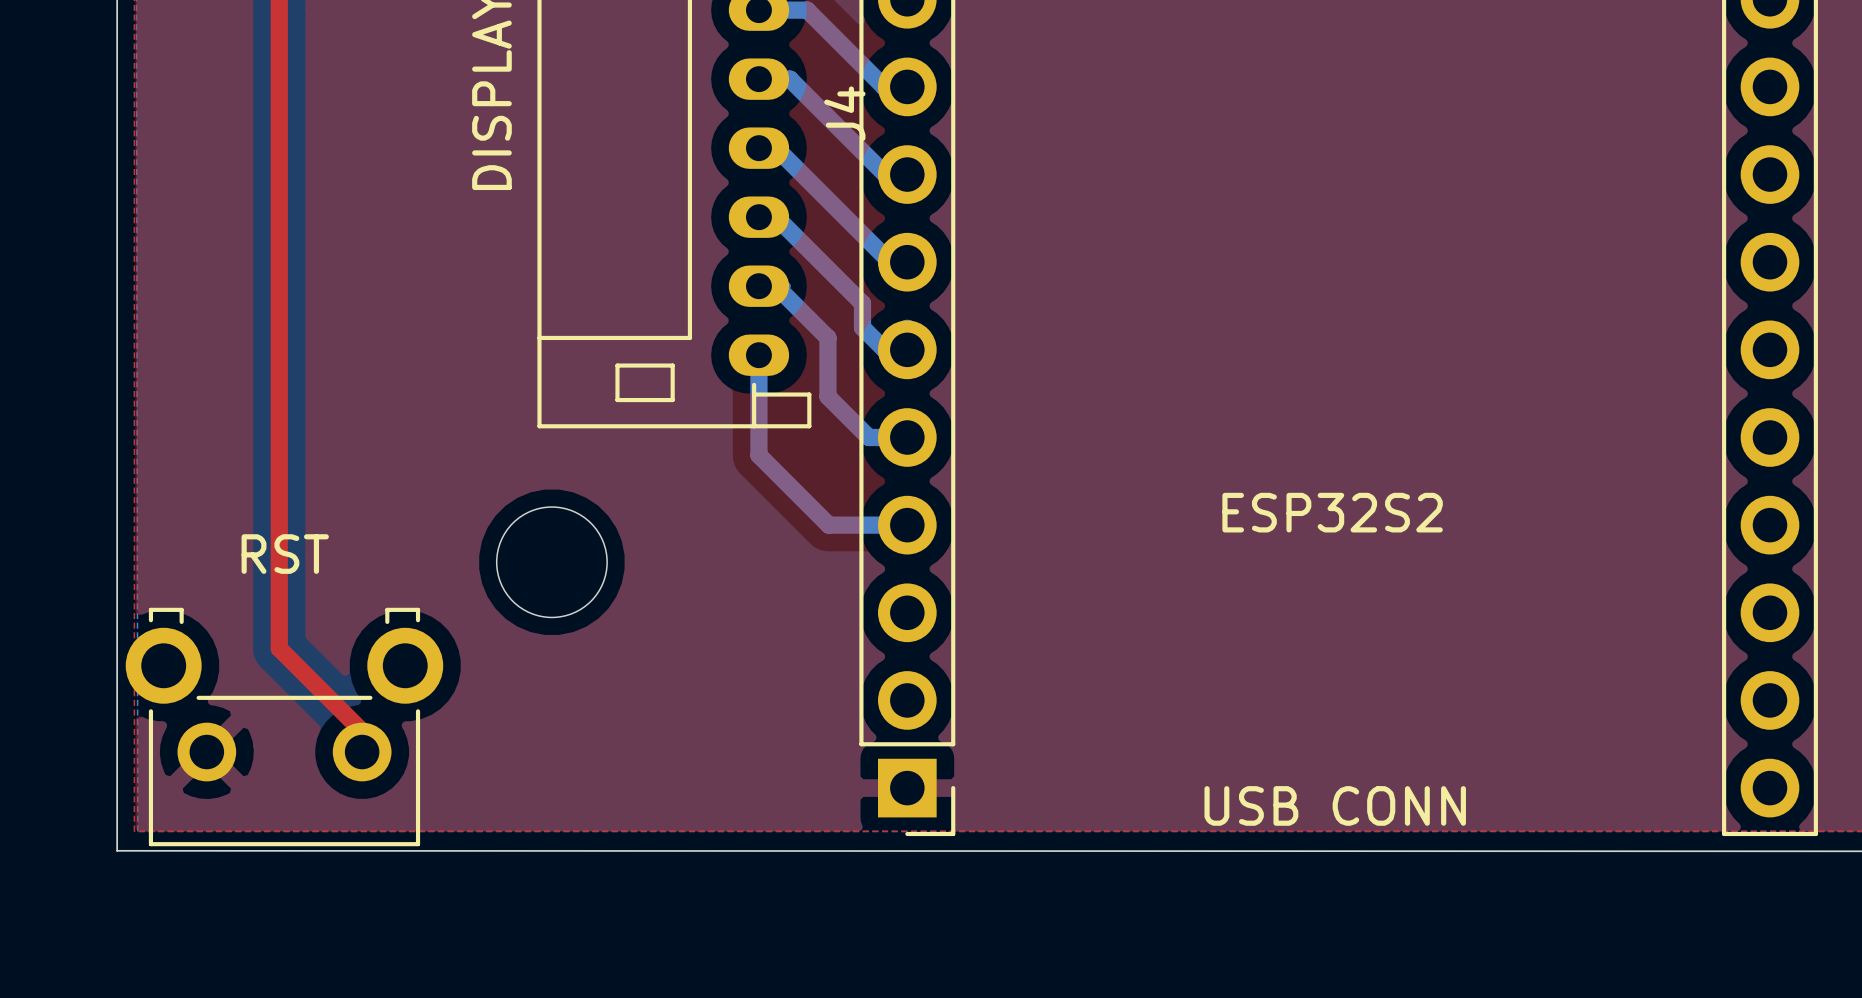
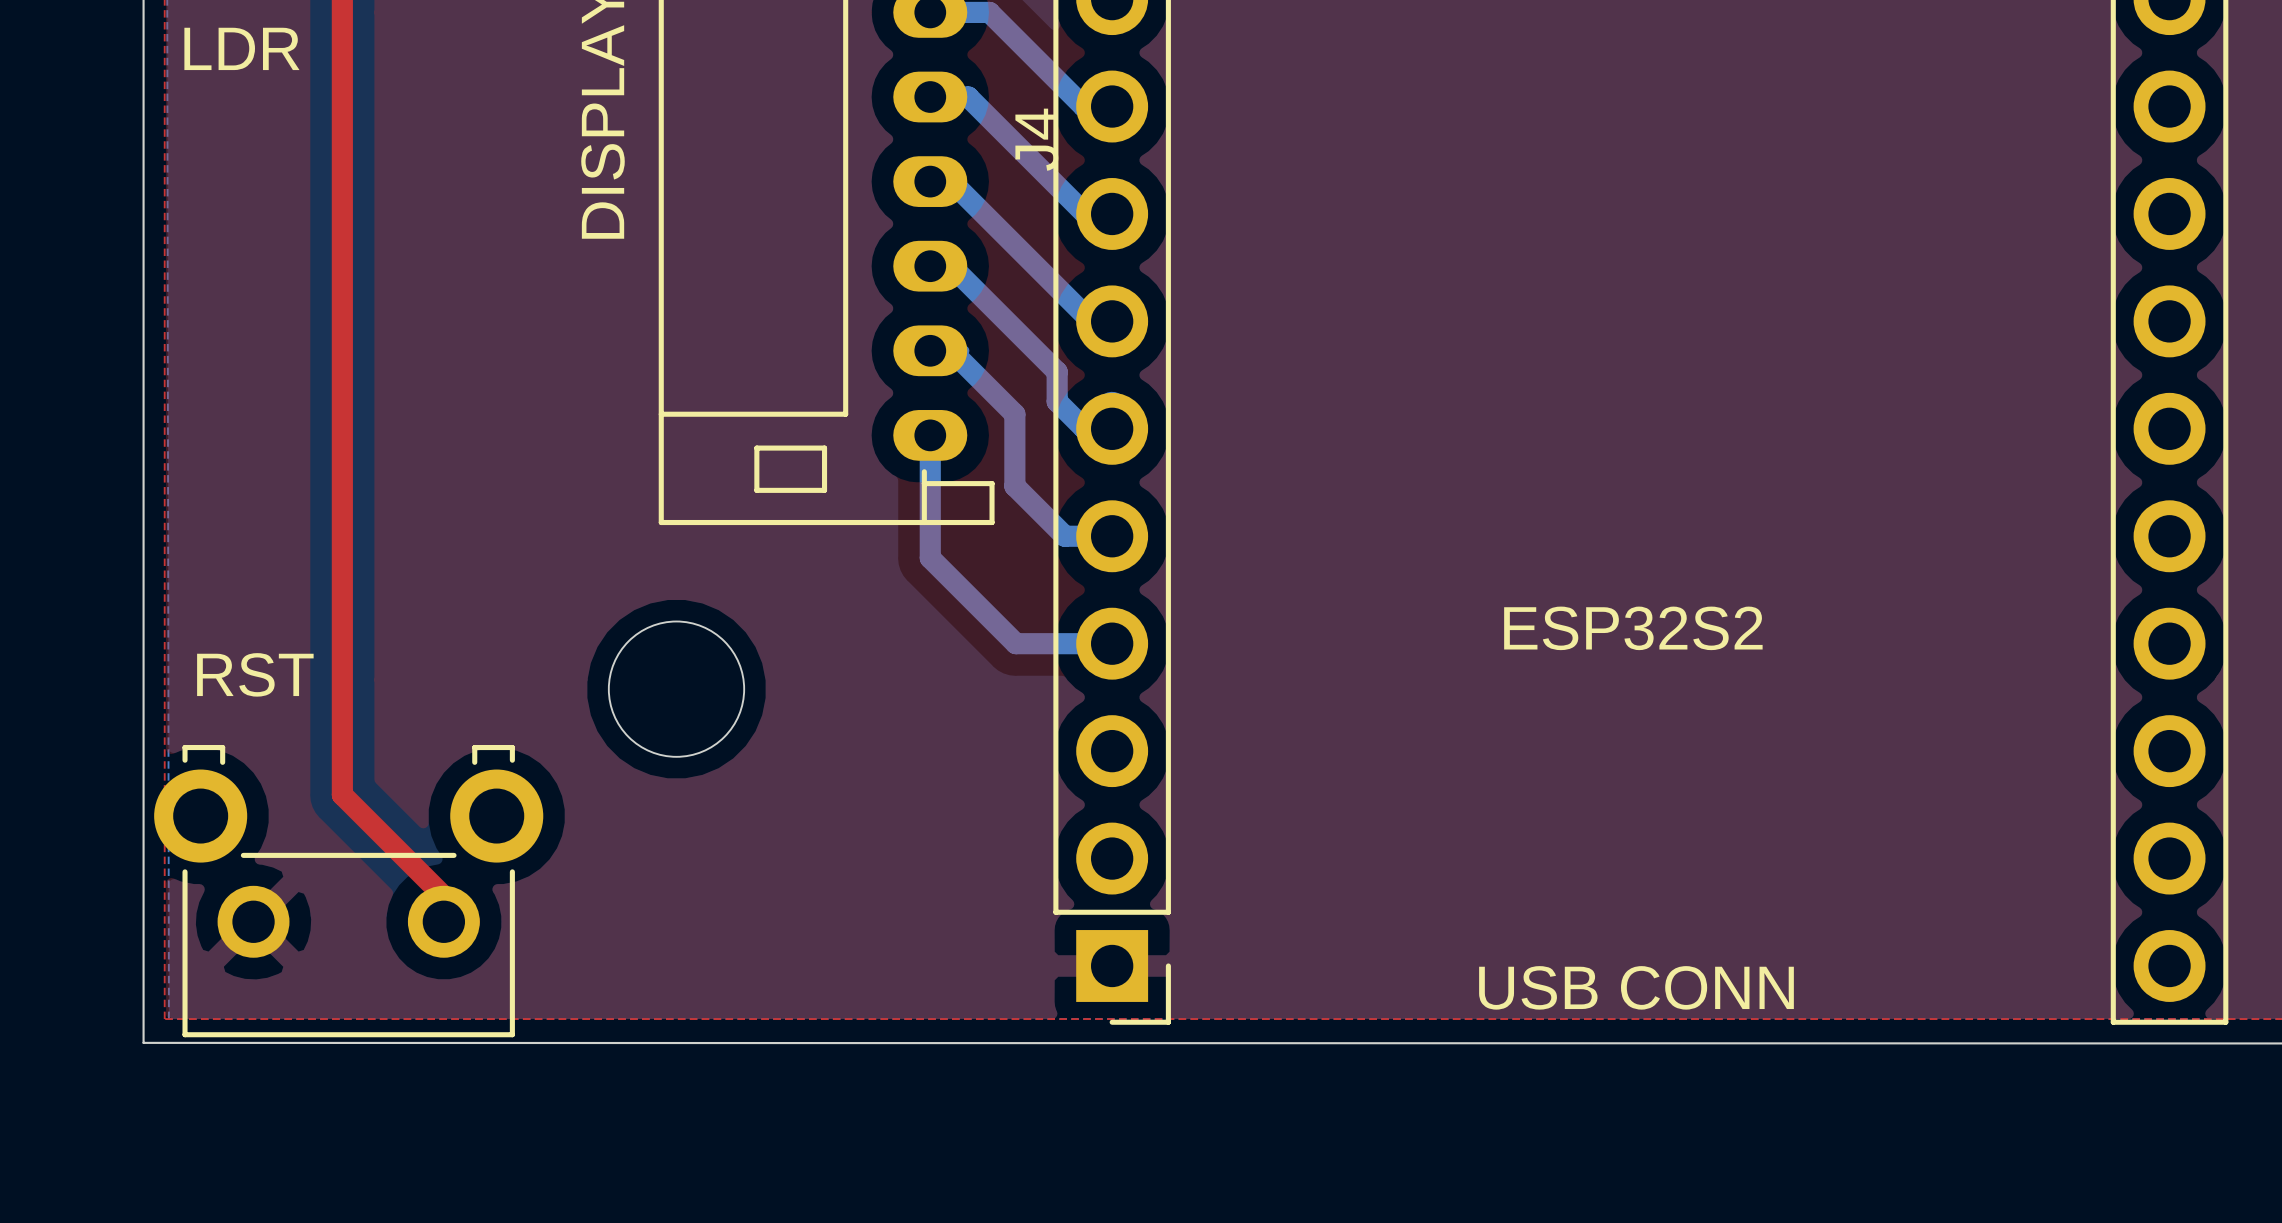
text: none -> LDR (241, 48)
text position: RST (285, 554) -> RST (255, 674)

